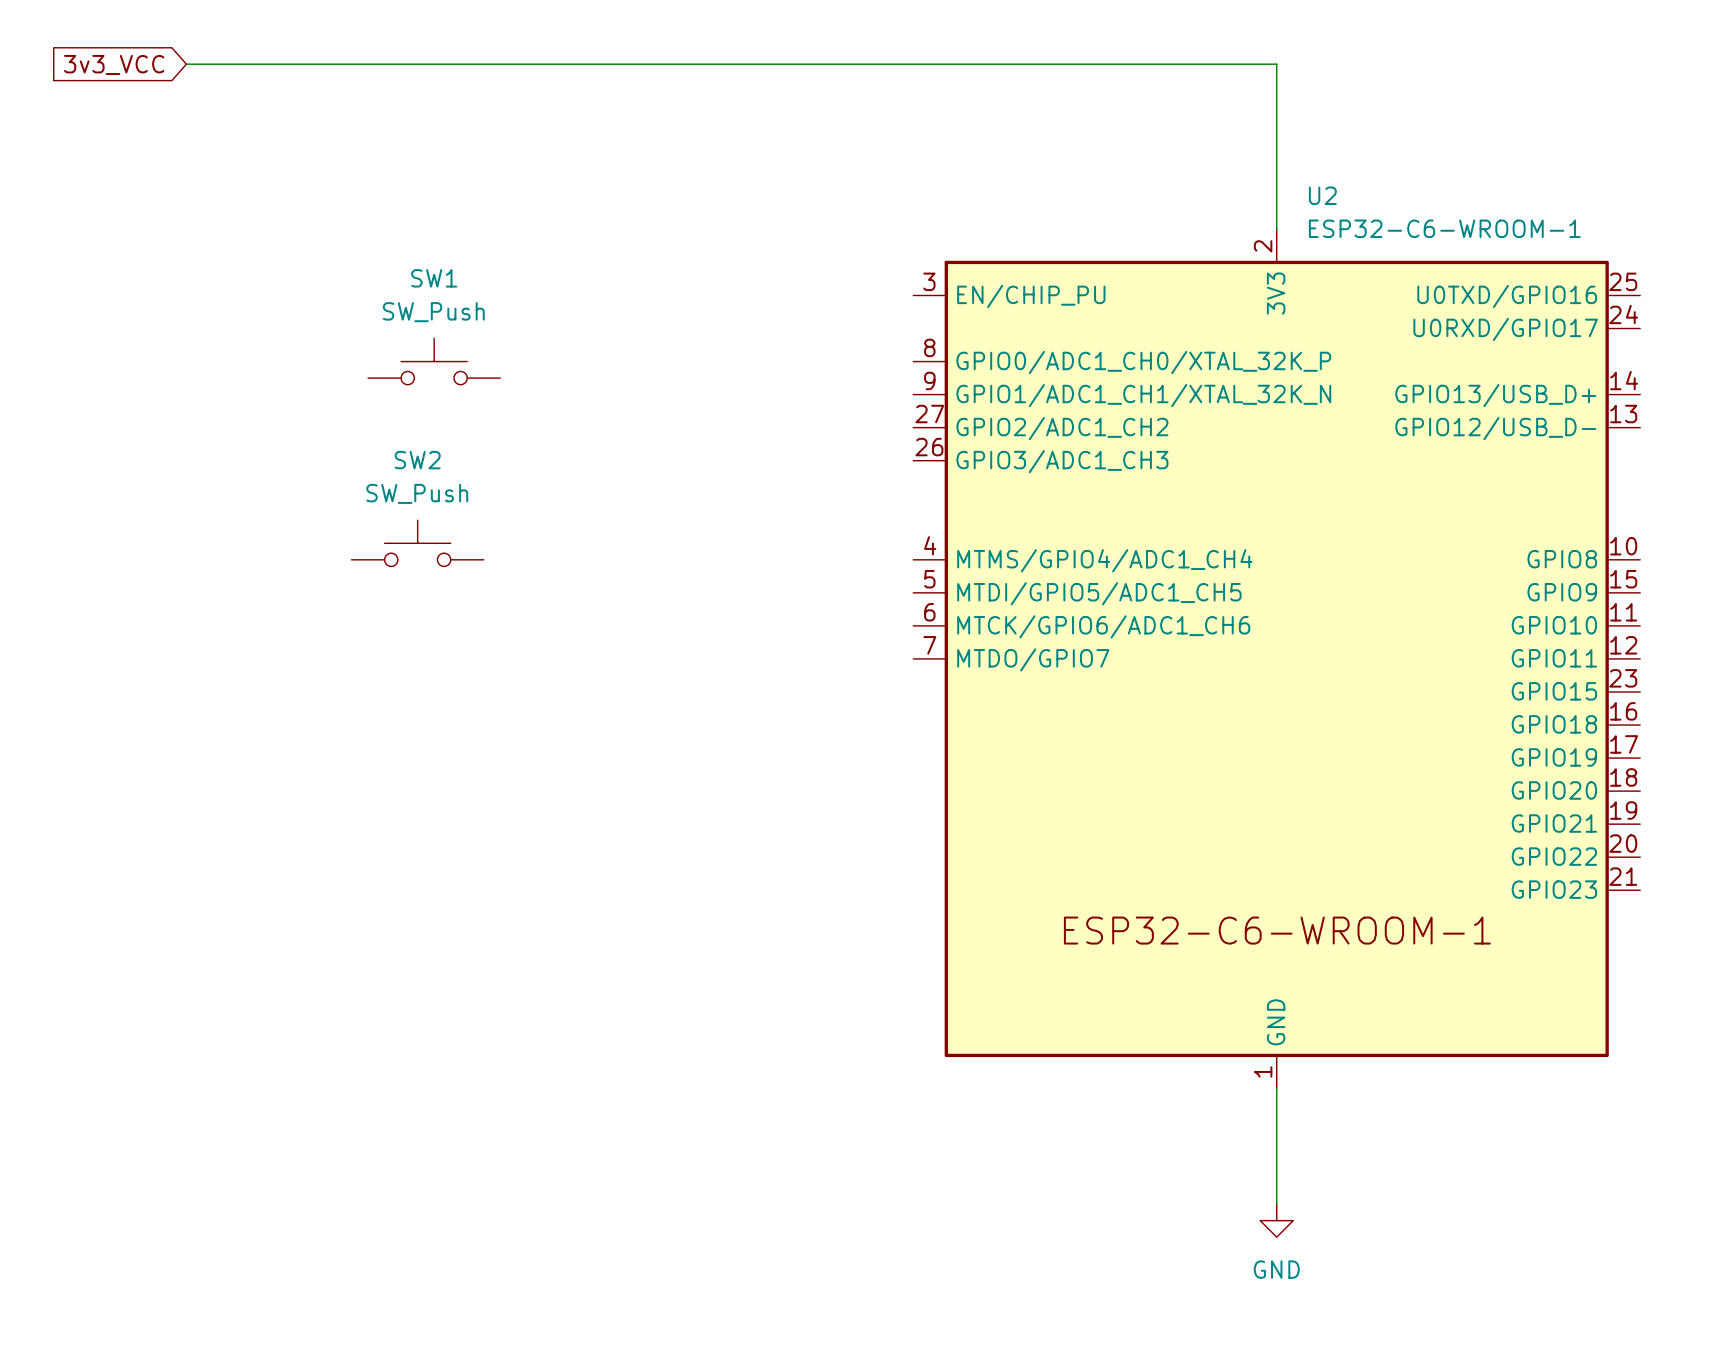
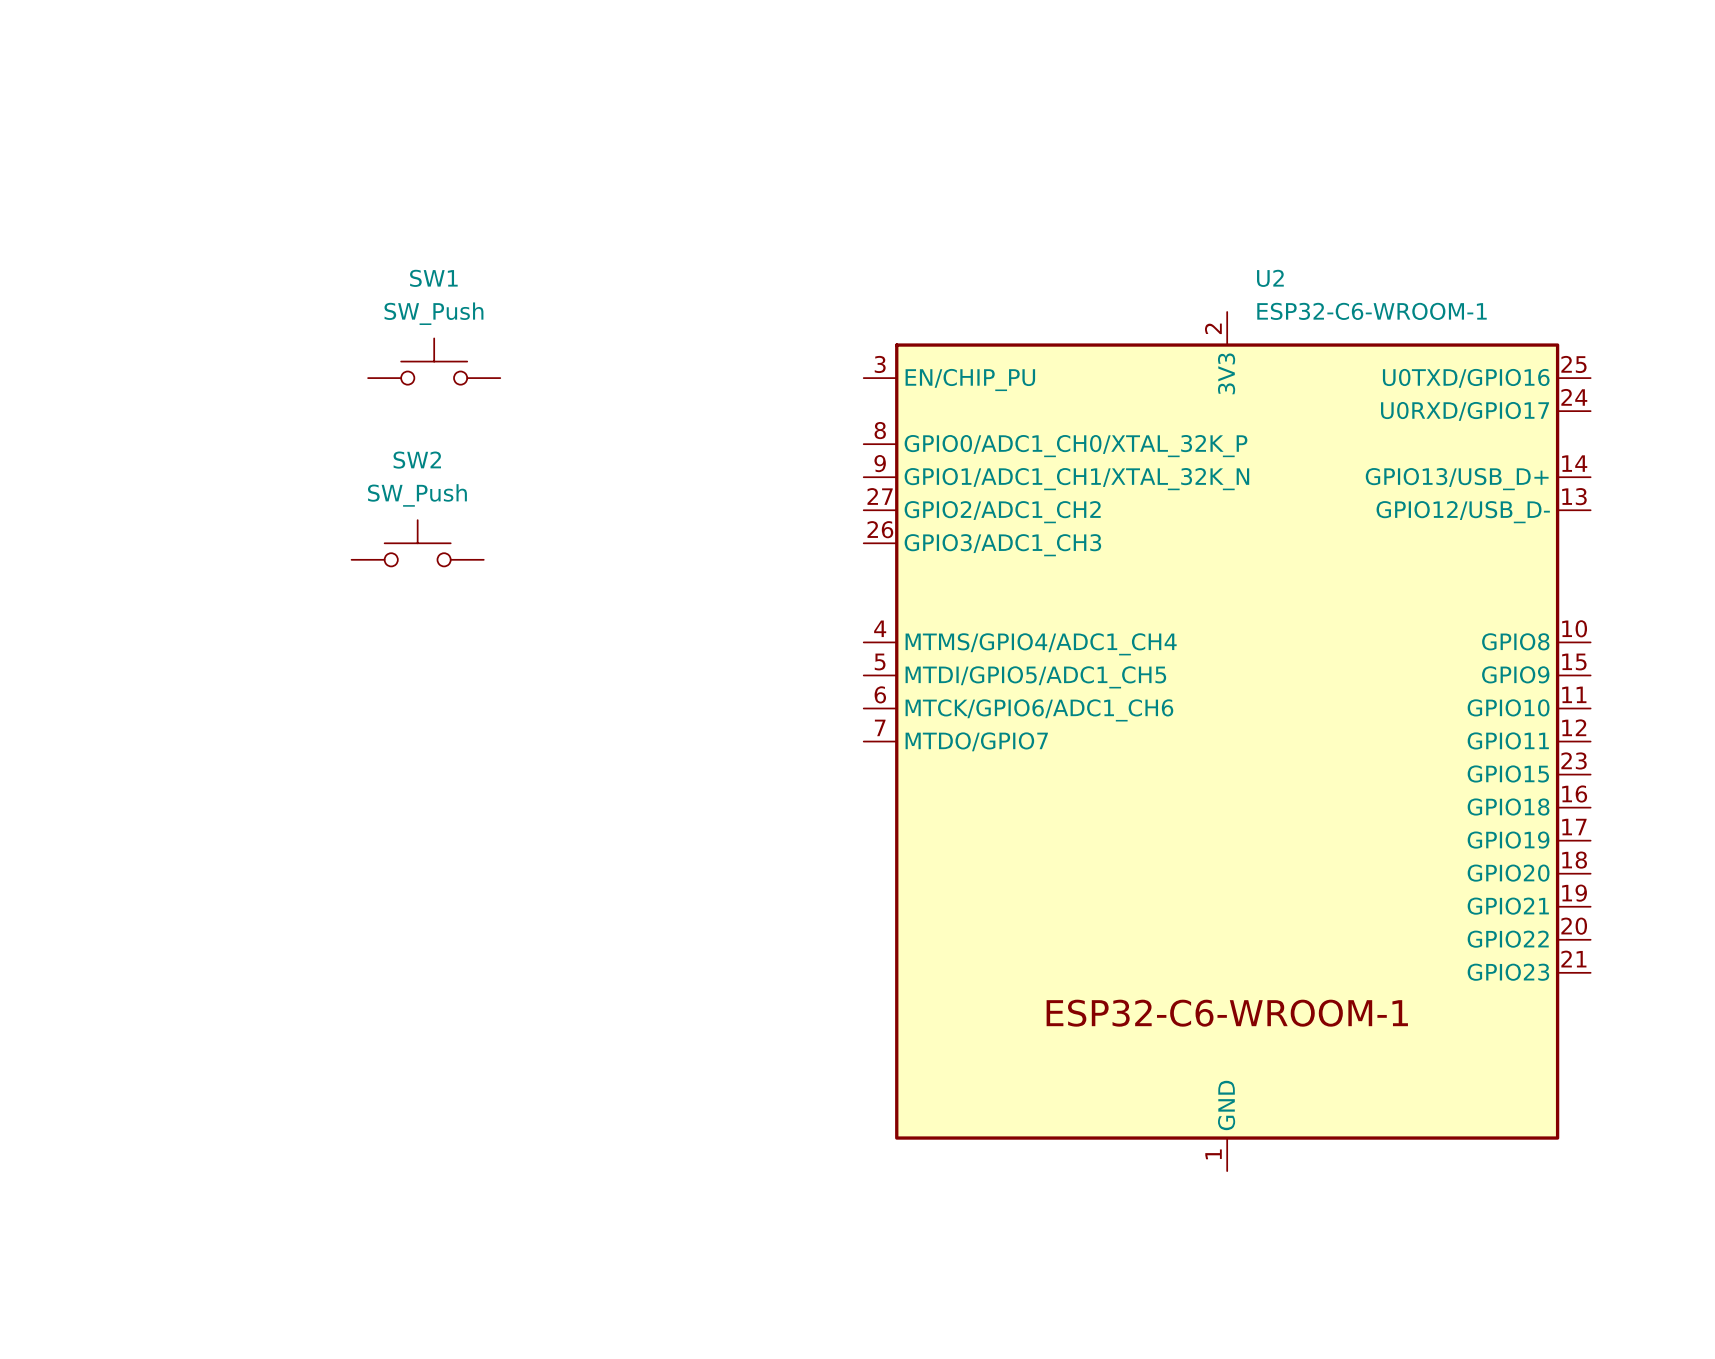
global label: 3v3_VCC (114, 64) -> none
wire: (186, 64) (1276, 64) (1276, 229) -> none
U2 position: (1276, 658) -> (1227, 741)
wire: (1276, 1088) (1276, 1204) -> none
power symbol: GND (1276, 1220) -> none

